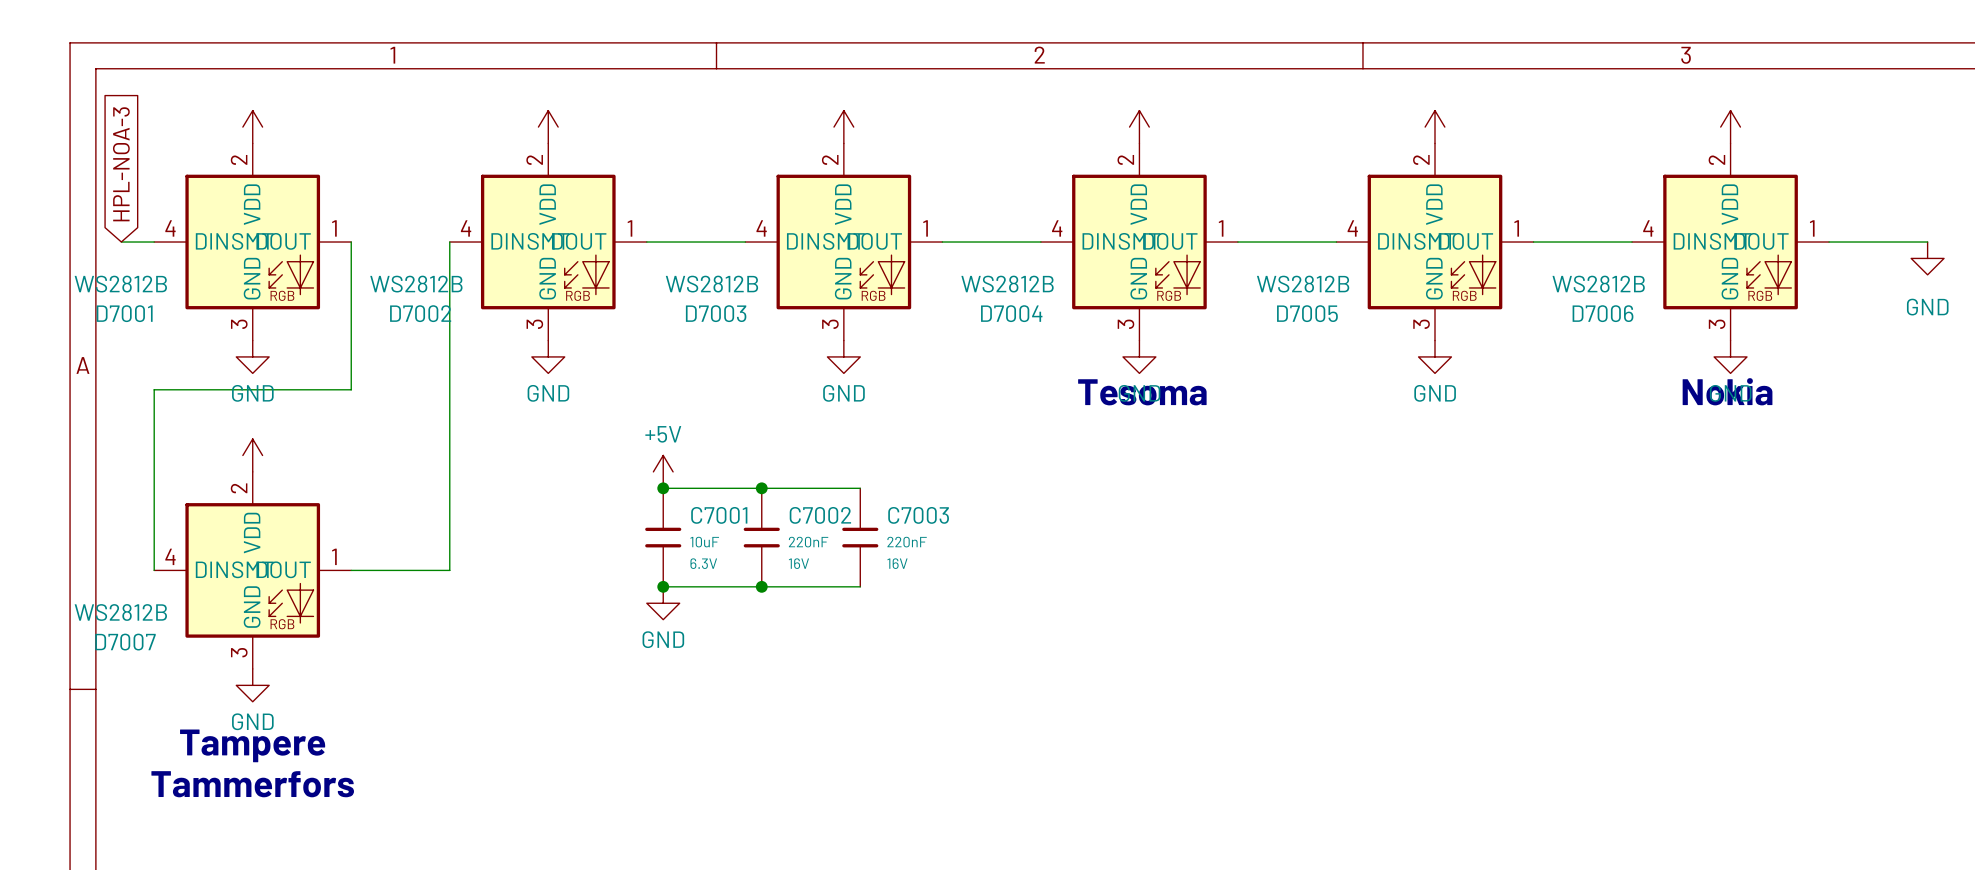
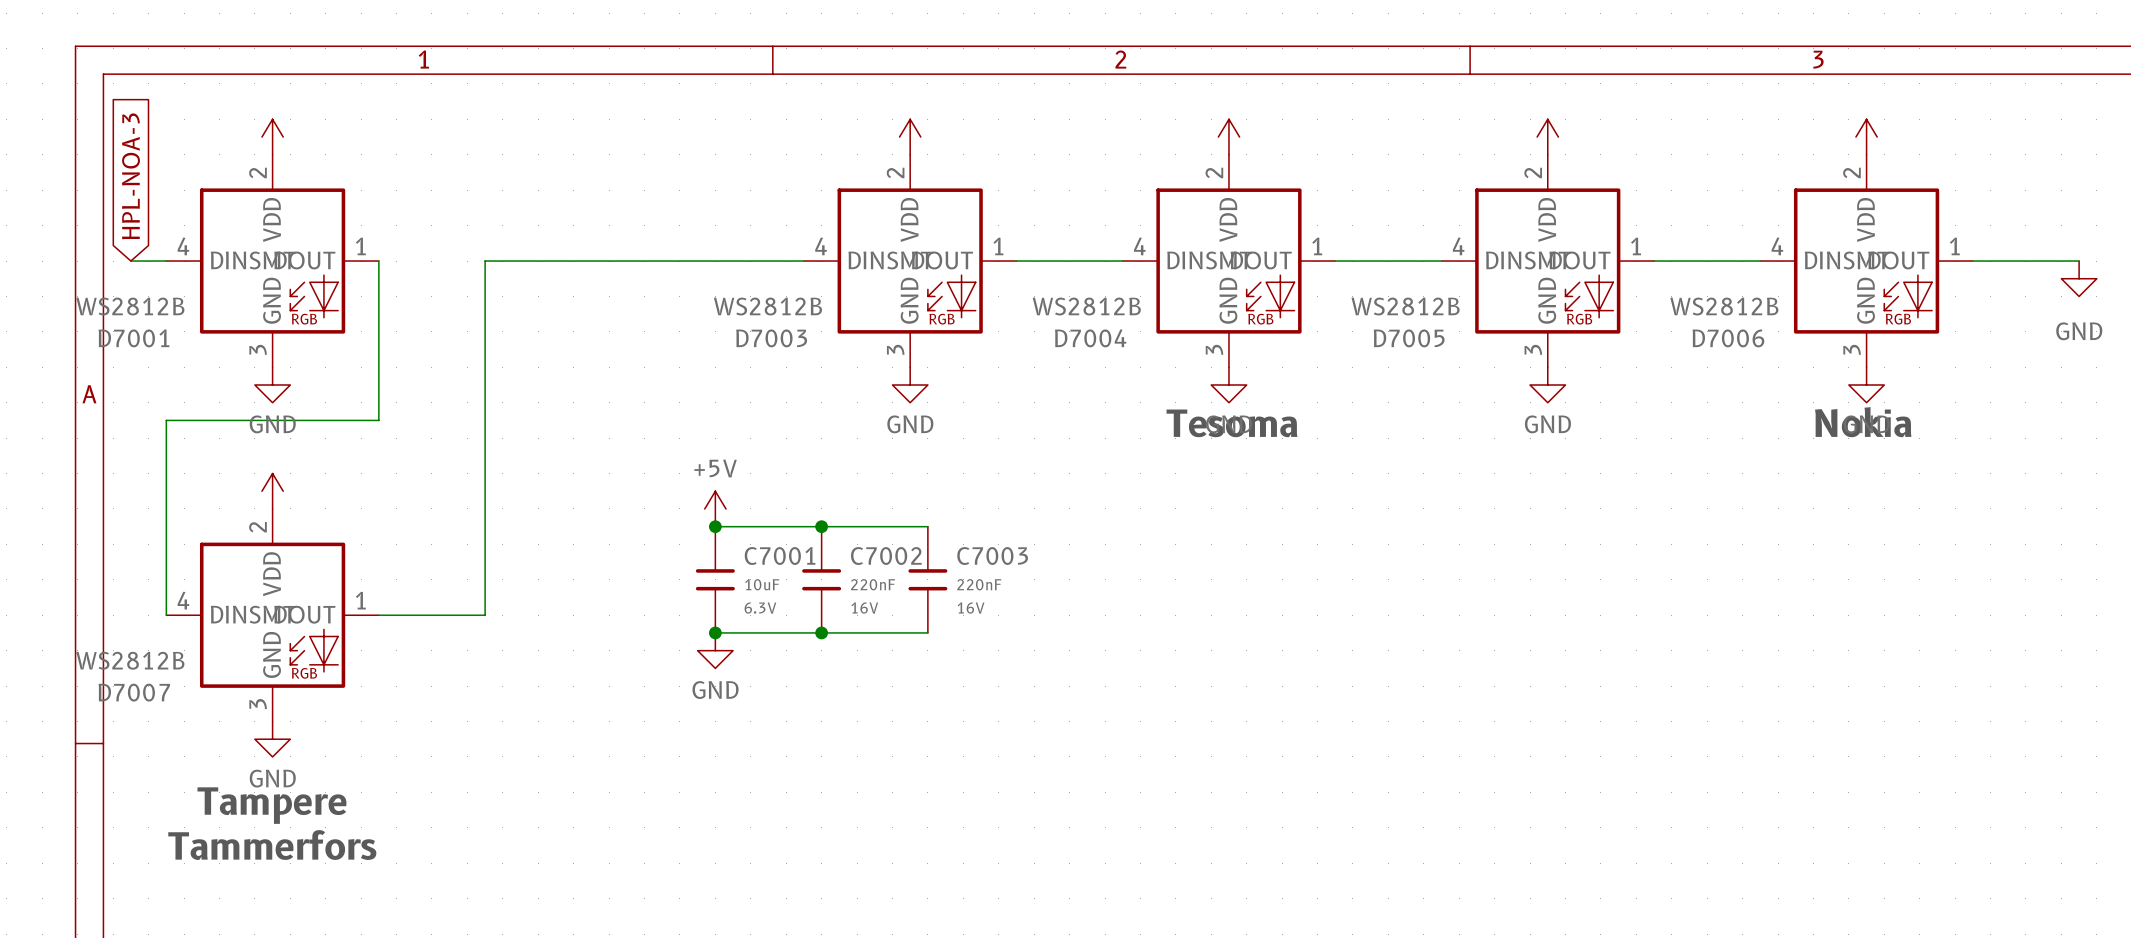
power symbol: (548, 127) -> none
D7002: WS2812B (548, 242) -> none
power symbol: GND (548, 356) -> none

